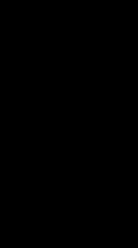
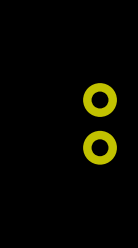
part: none -> (100, 123)

